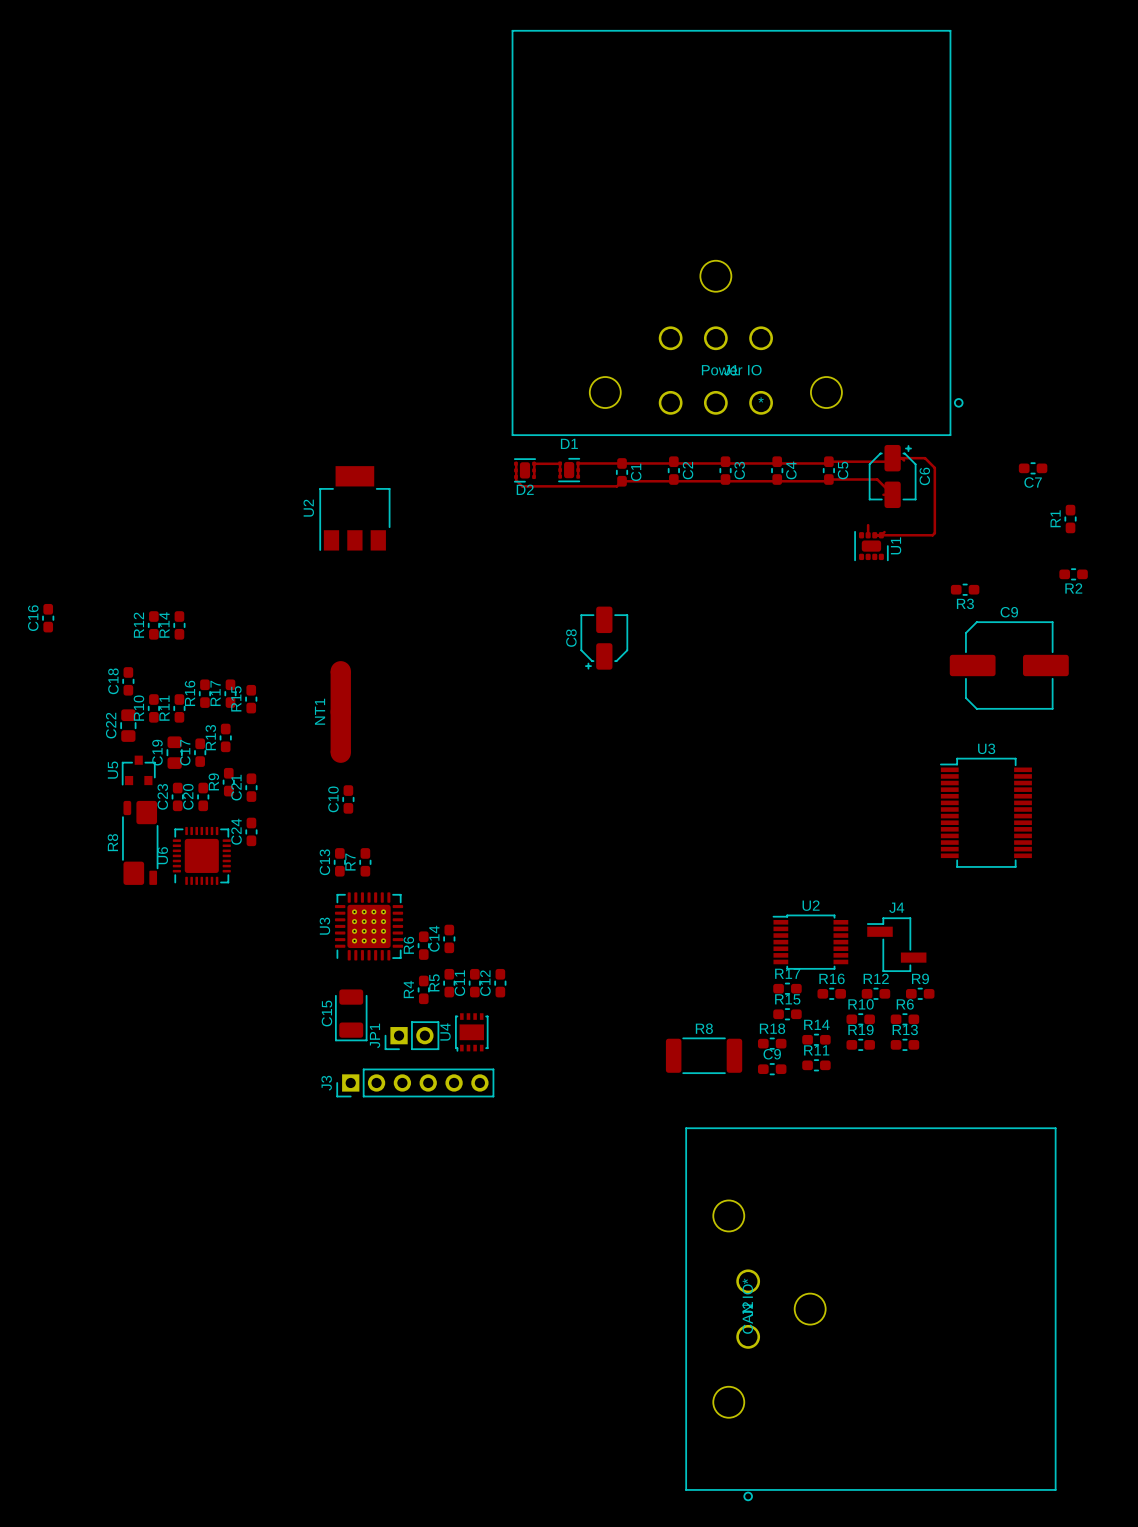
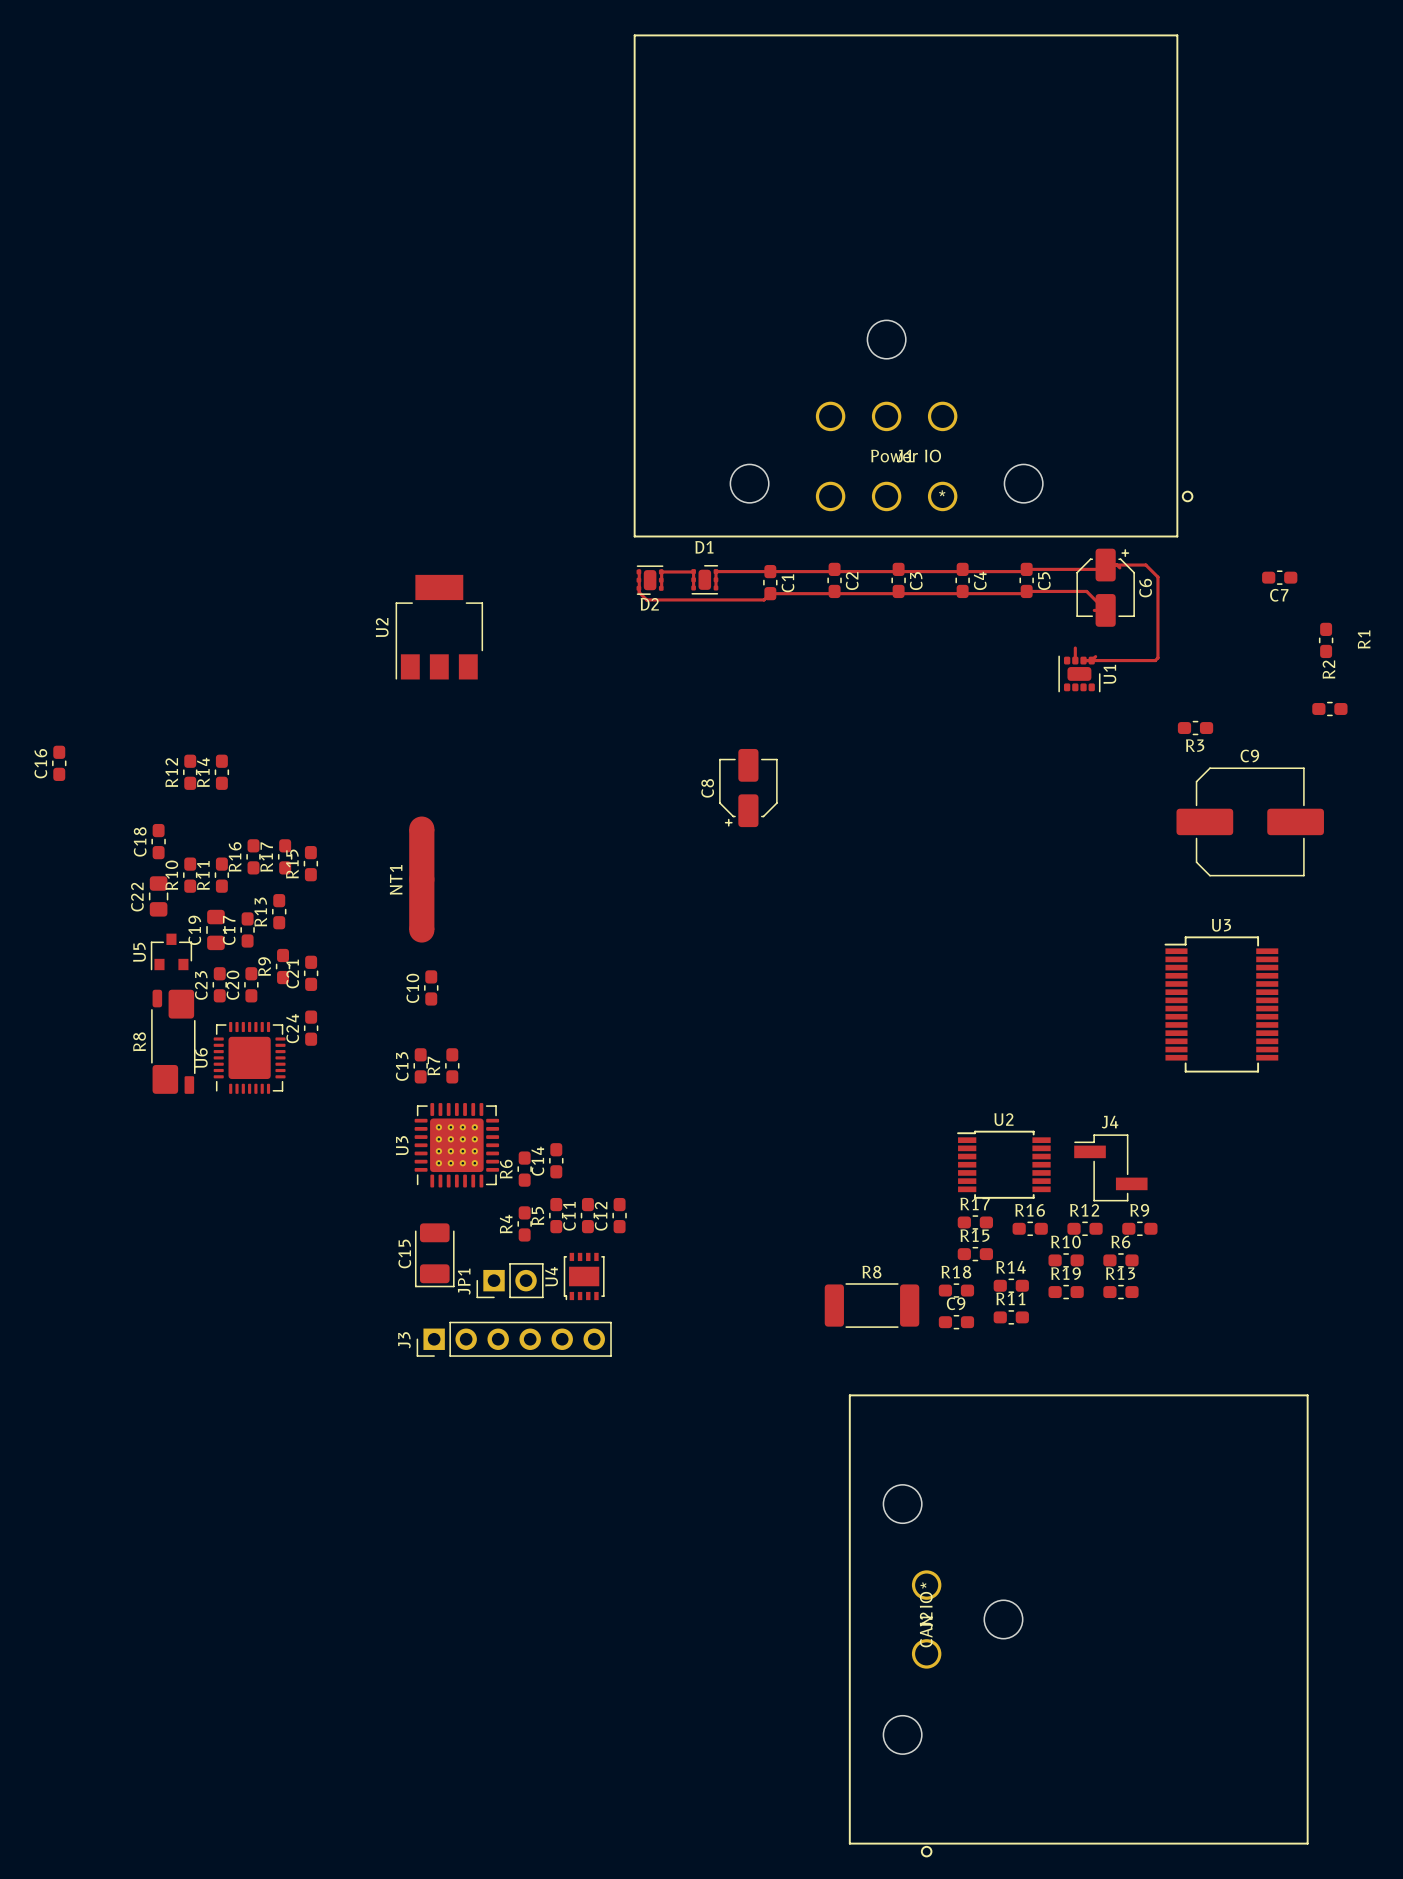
R1 name position: R1 (1055, 518) -> R1 (1364, 639)
R2 name rotation: 0° (1073, 588) -> 90° counterclockwise (1328, 669)
R2 name position: R2 (1073, 588) -> R2 (1328, 669)

